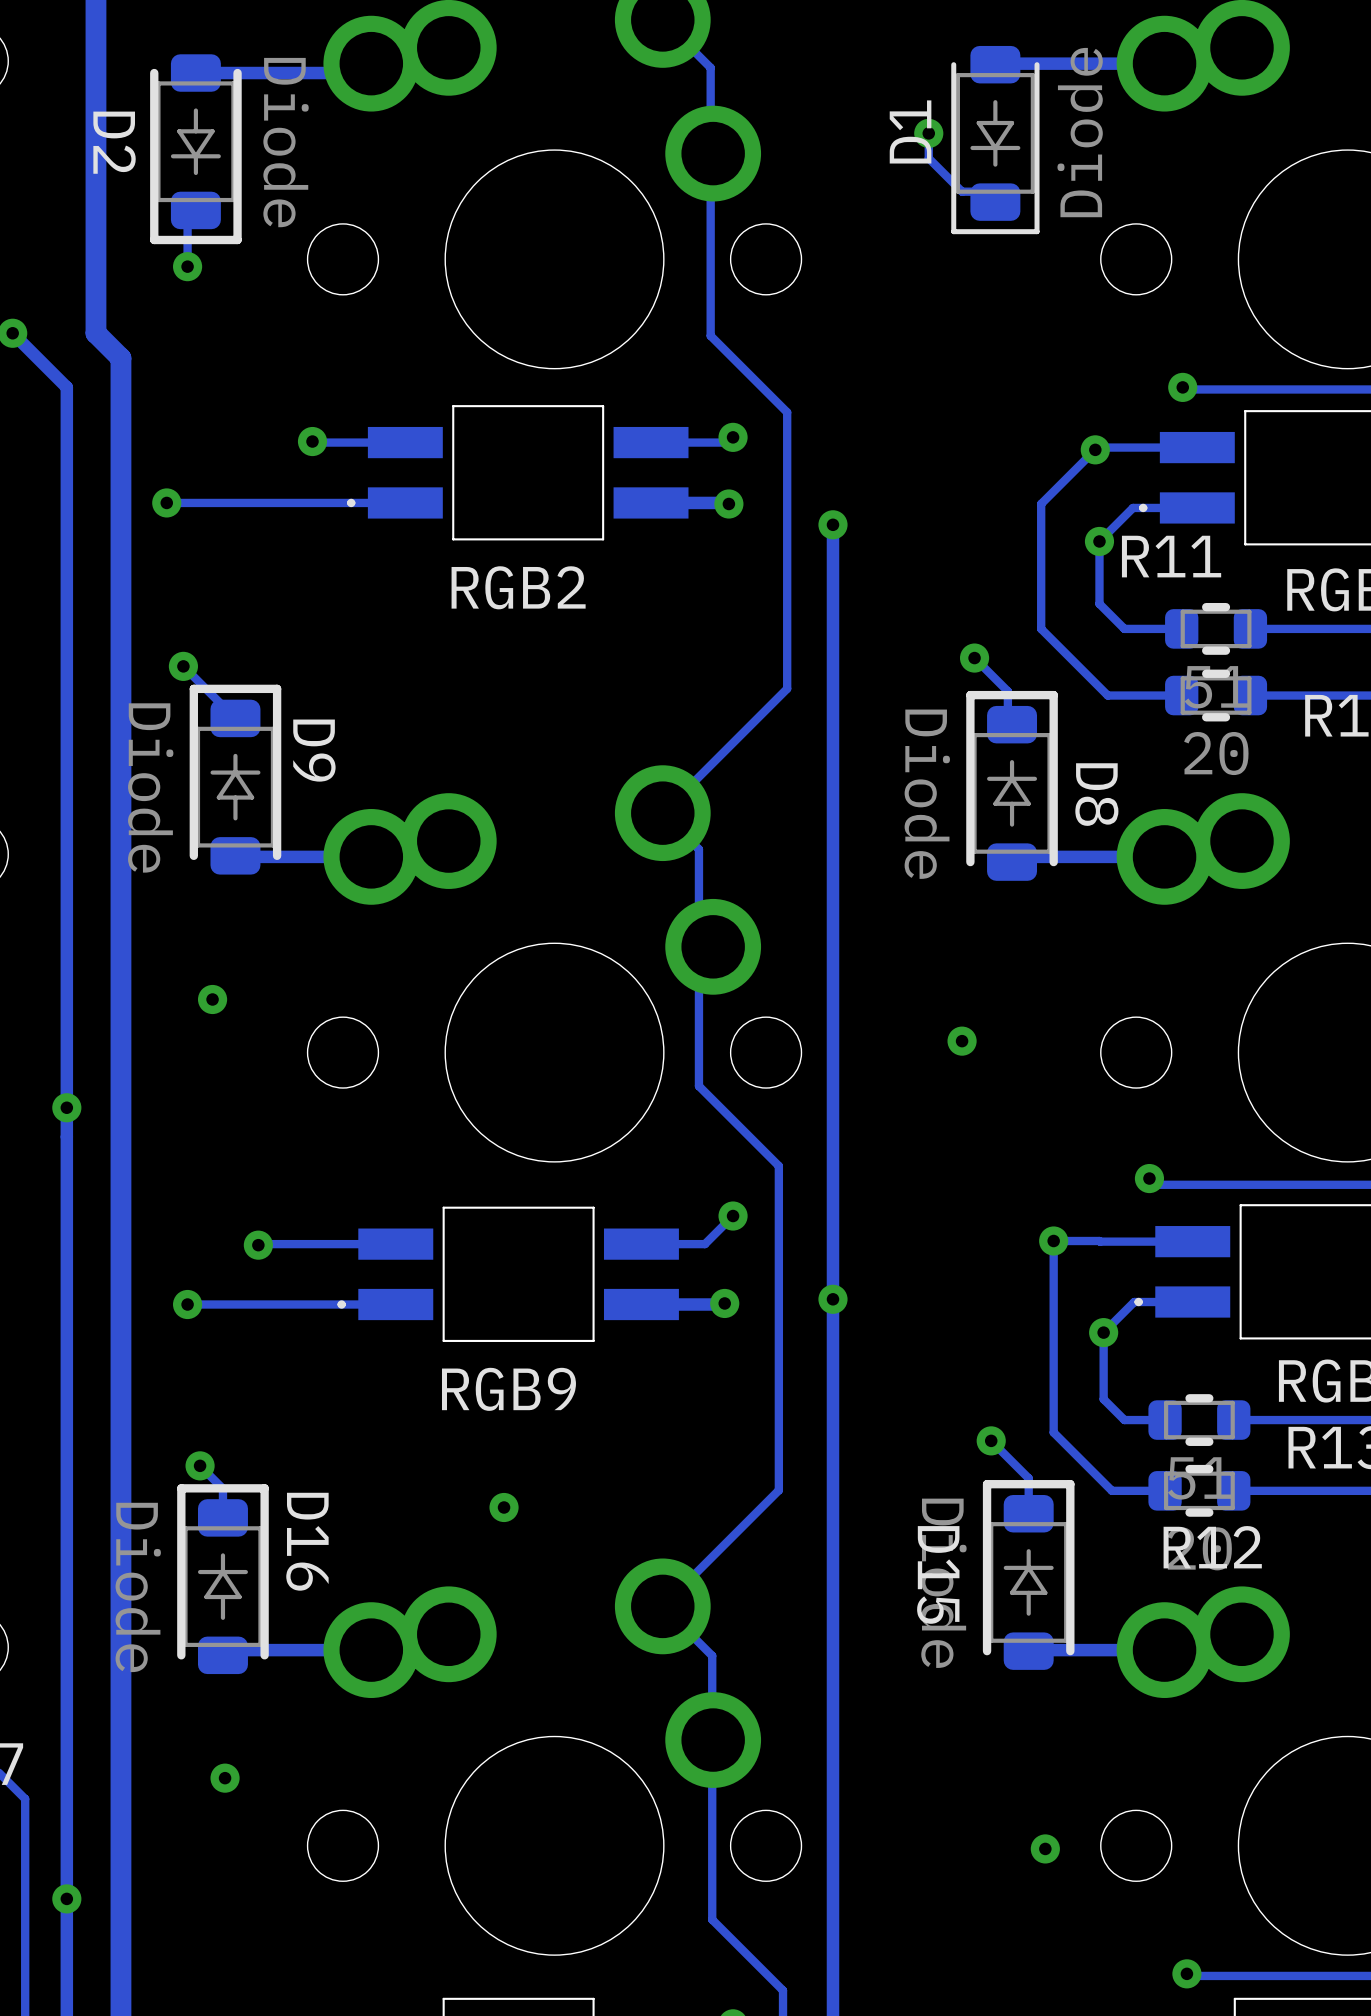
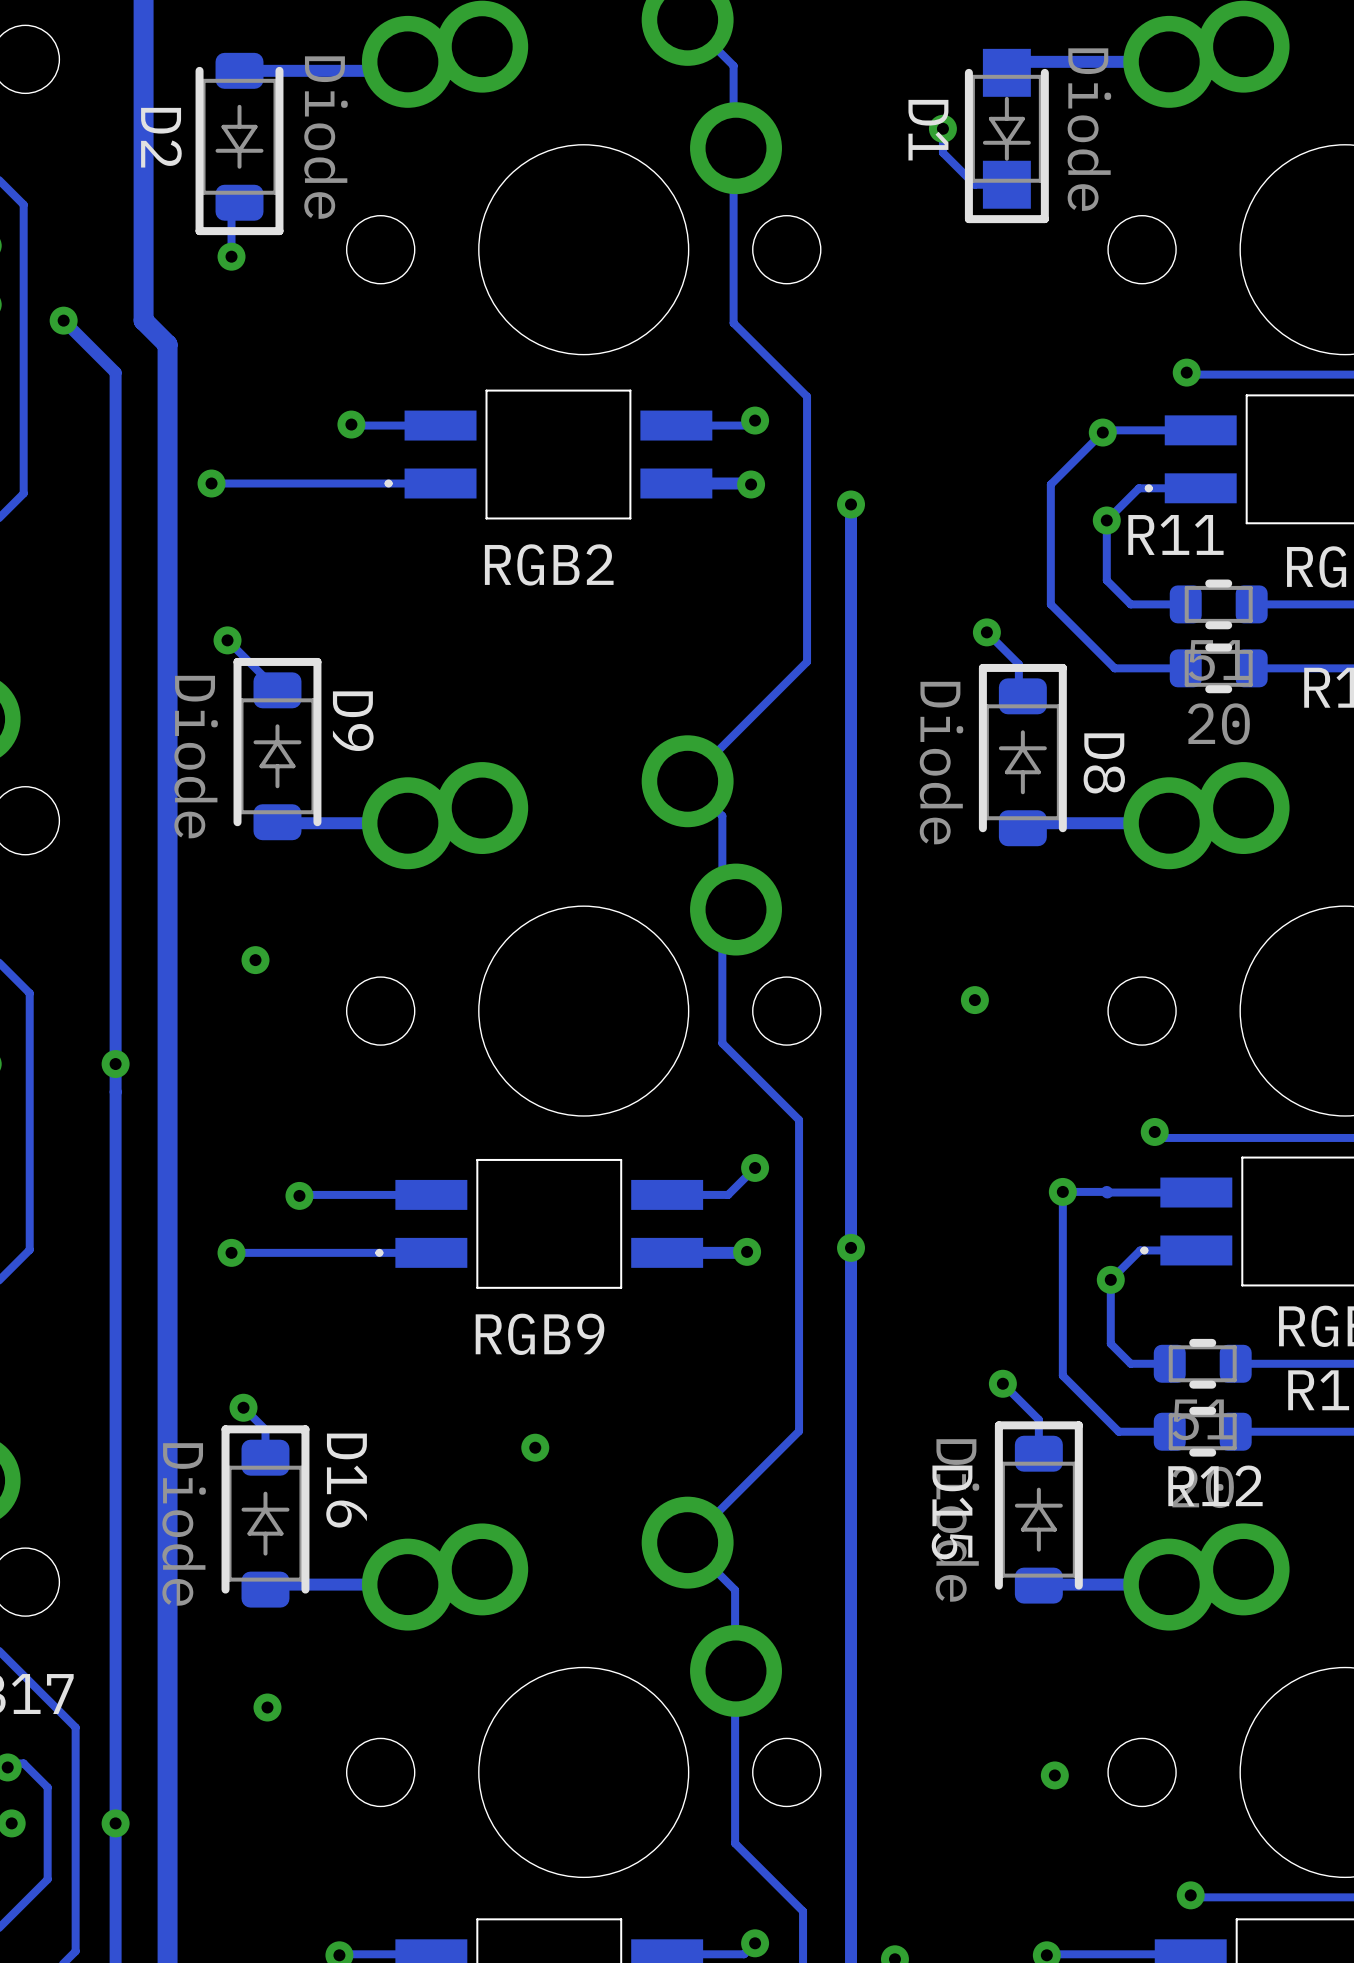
D1 footprint: [951, 45, 1040, 235] -> [964, 48, 1049, 224]
D1 name rotation: 0° (910, 131) -> 180° (928, 130)
D1 value rotation: 0° (1080, 132) -> 180° (1089, 129)

